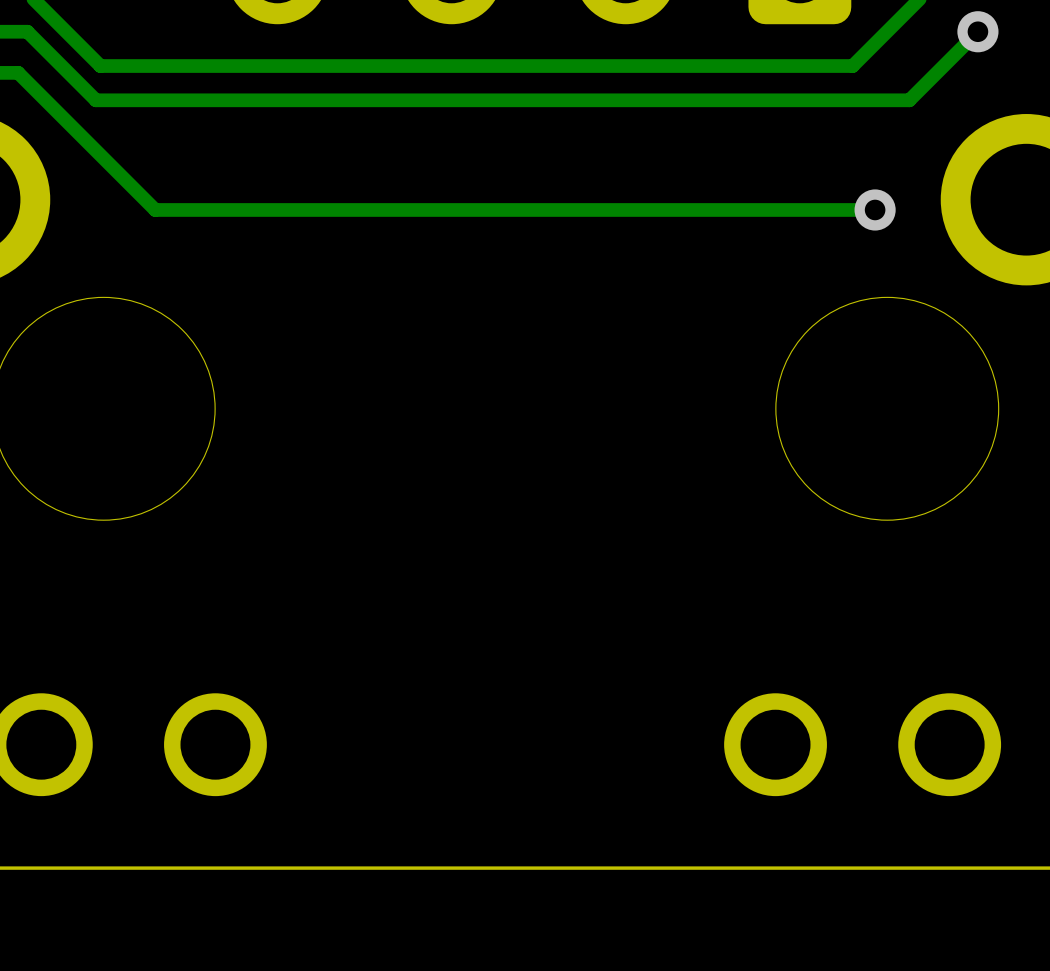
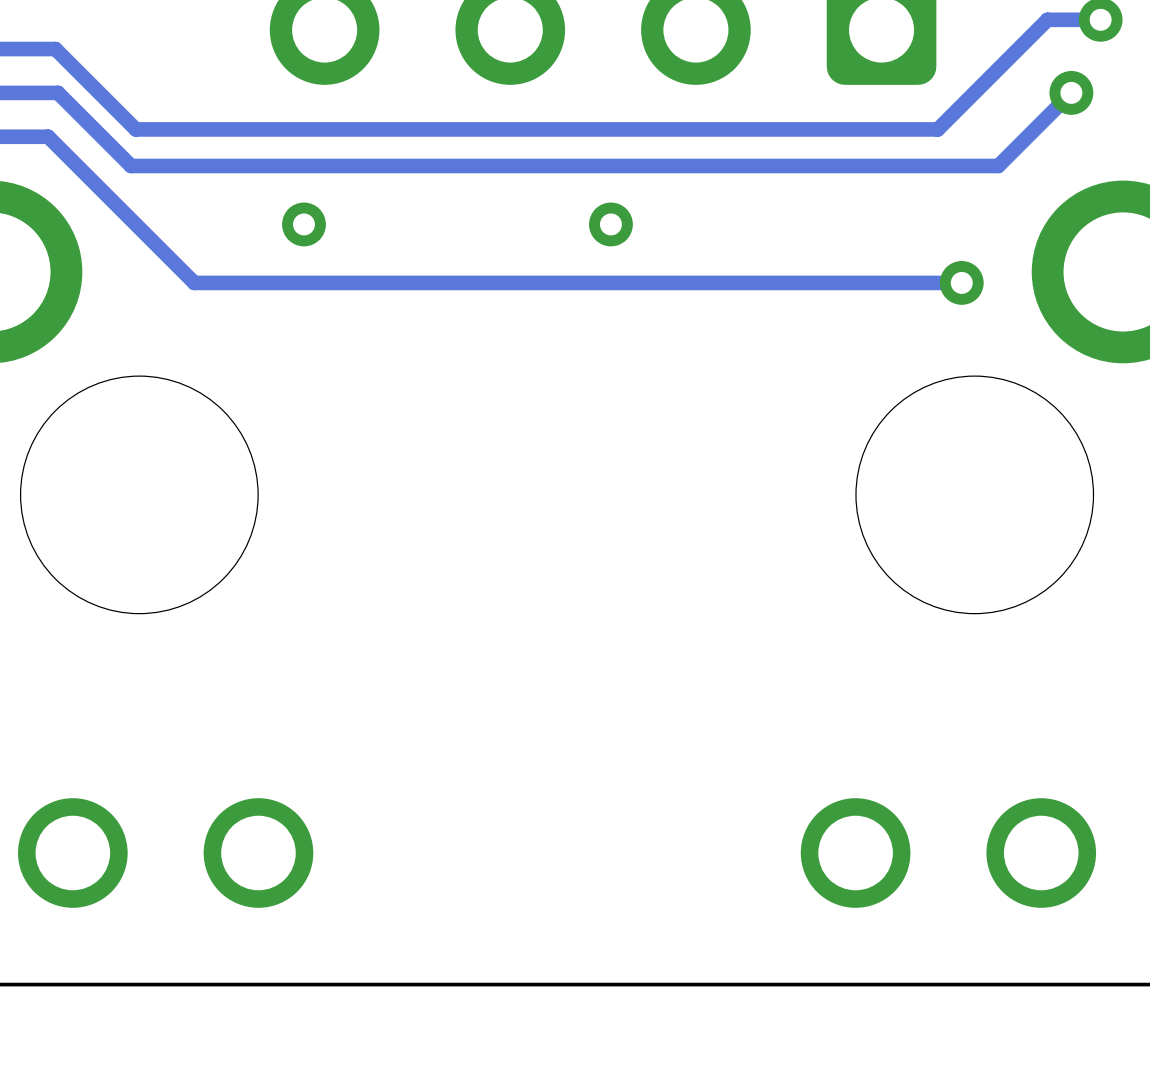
via: none -> (303, 224)
via: none -> (610, 224)

